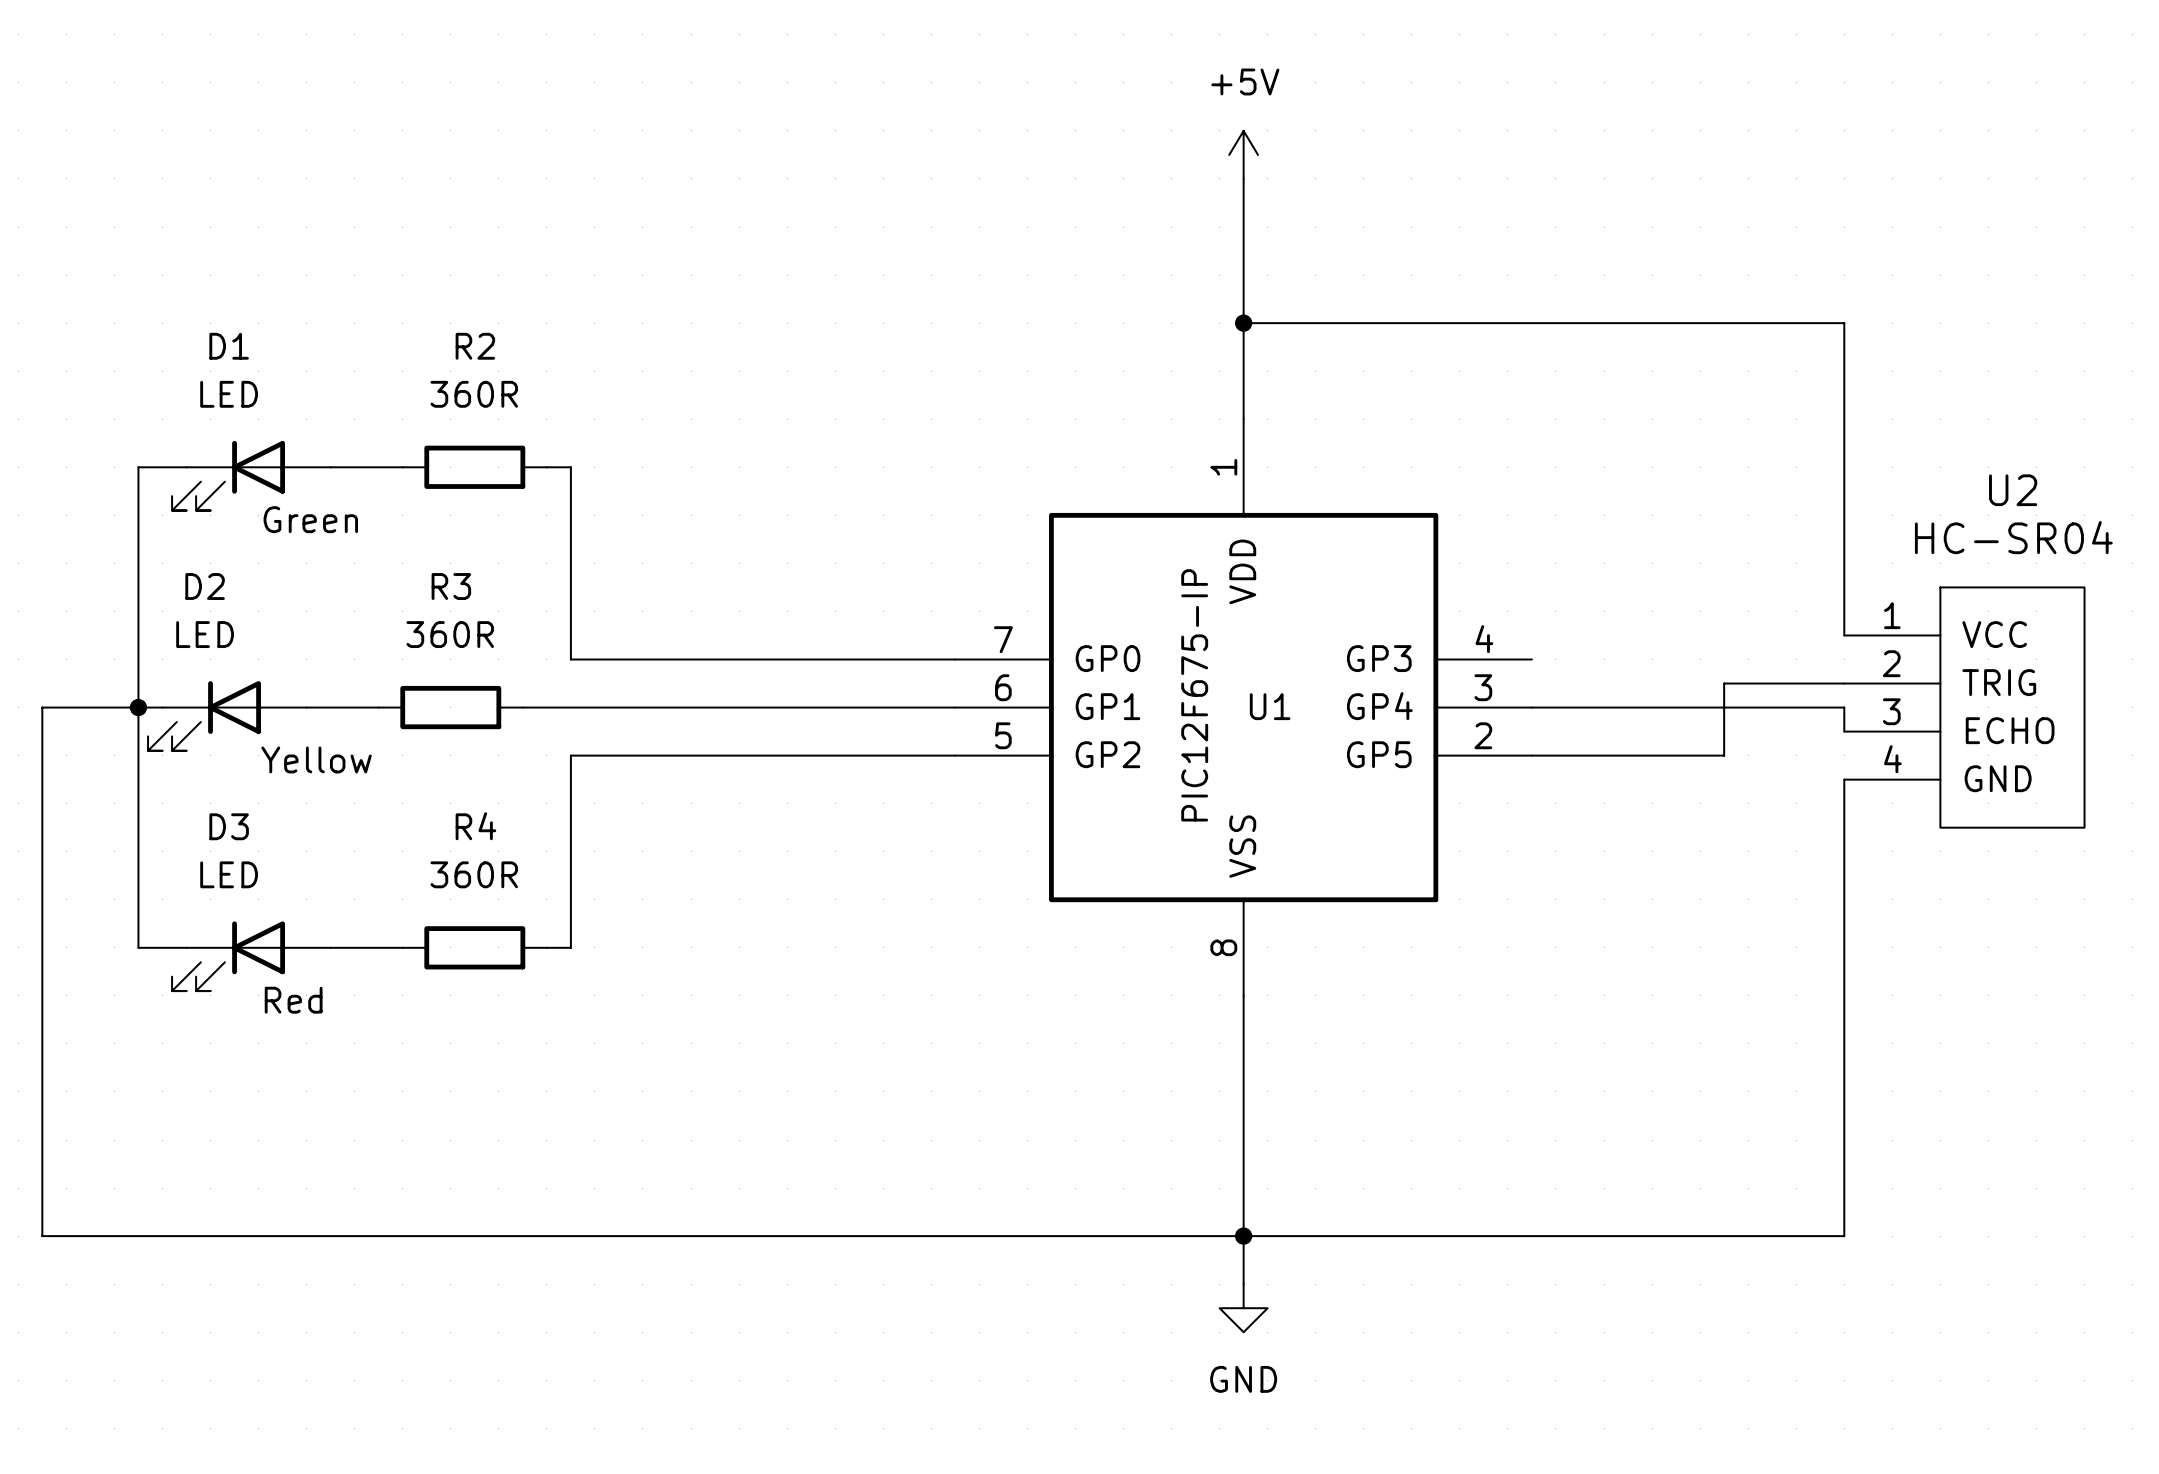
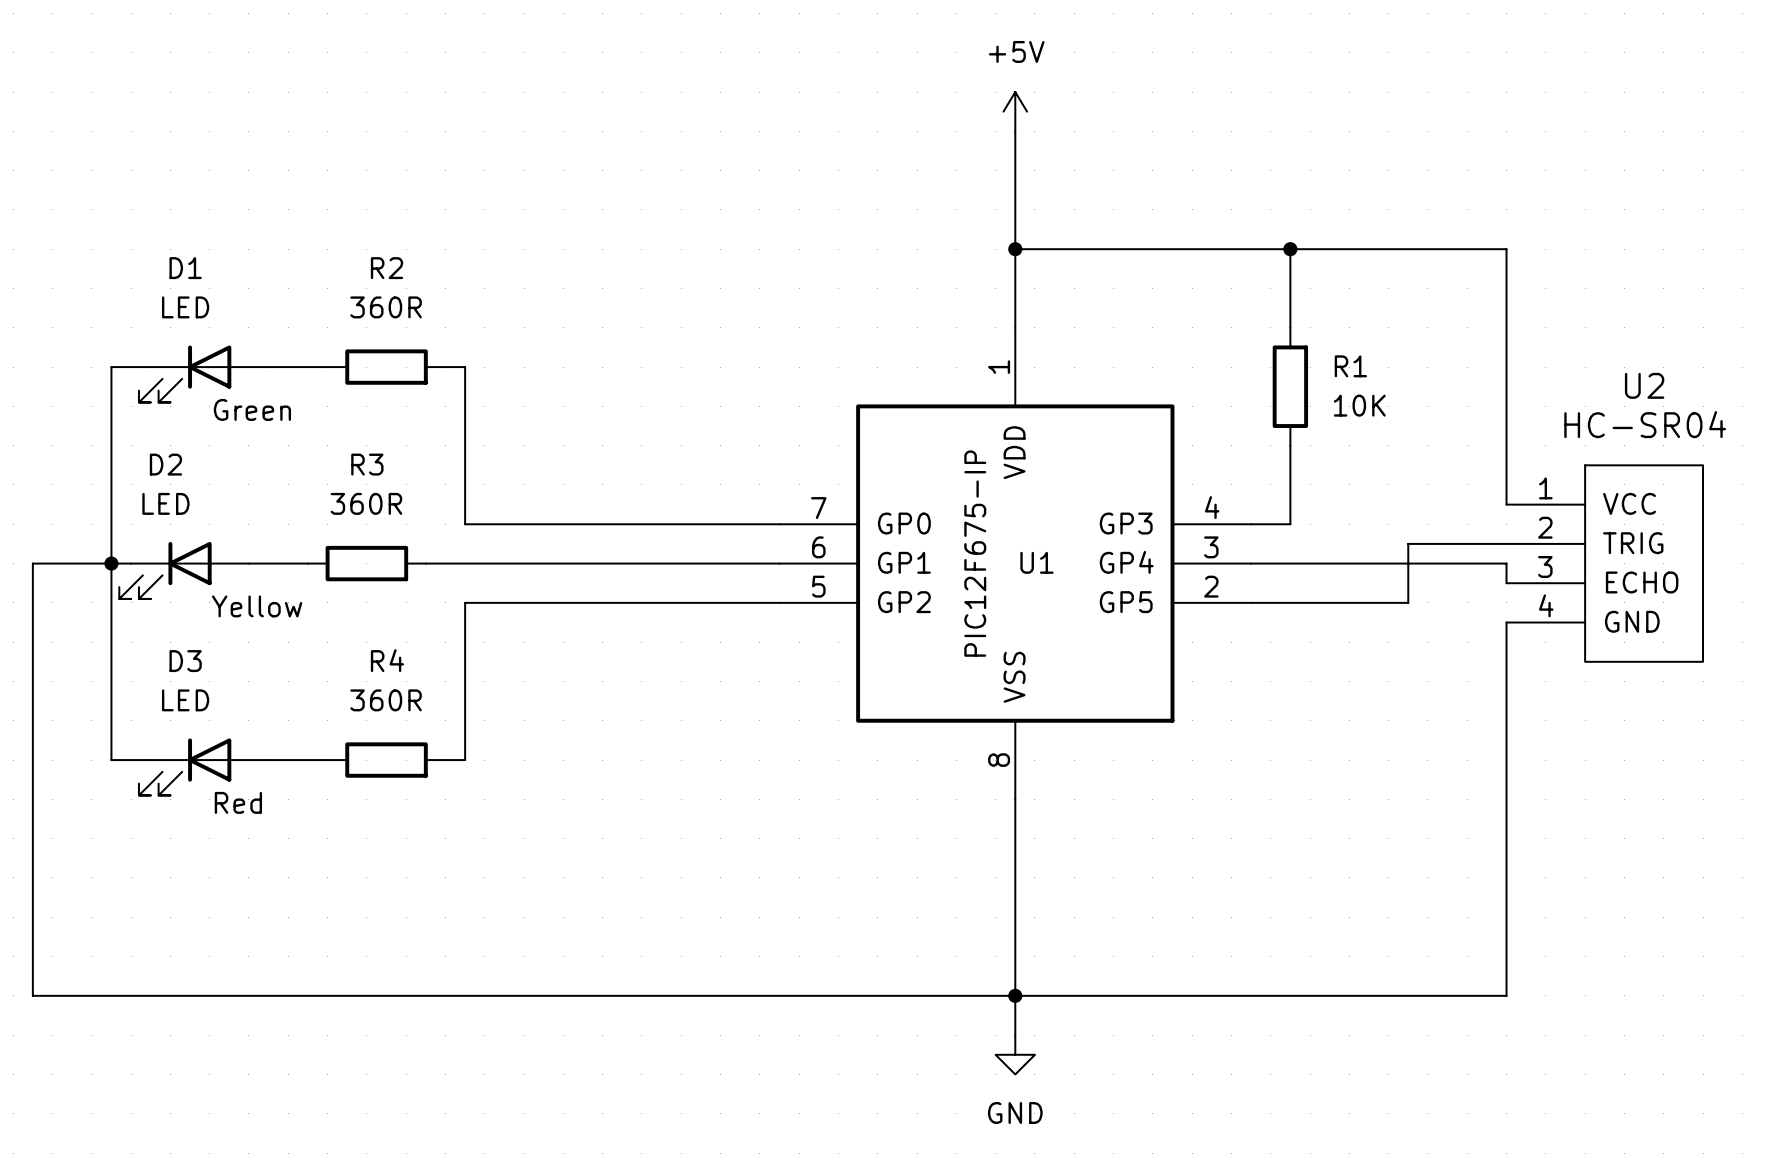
wire: none -> (1290, 249) (1290, 327)
junction: none -> (1290, 249)
R1: none -> 10K (1290, 386)
wire: none -> (1290, 445) (1290, 524) (1251, 524)

